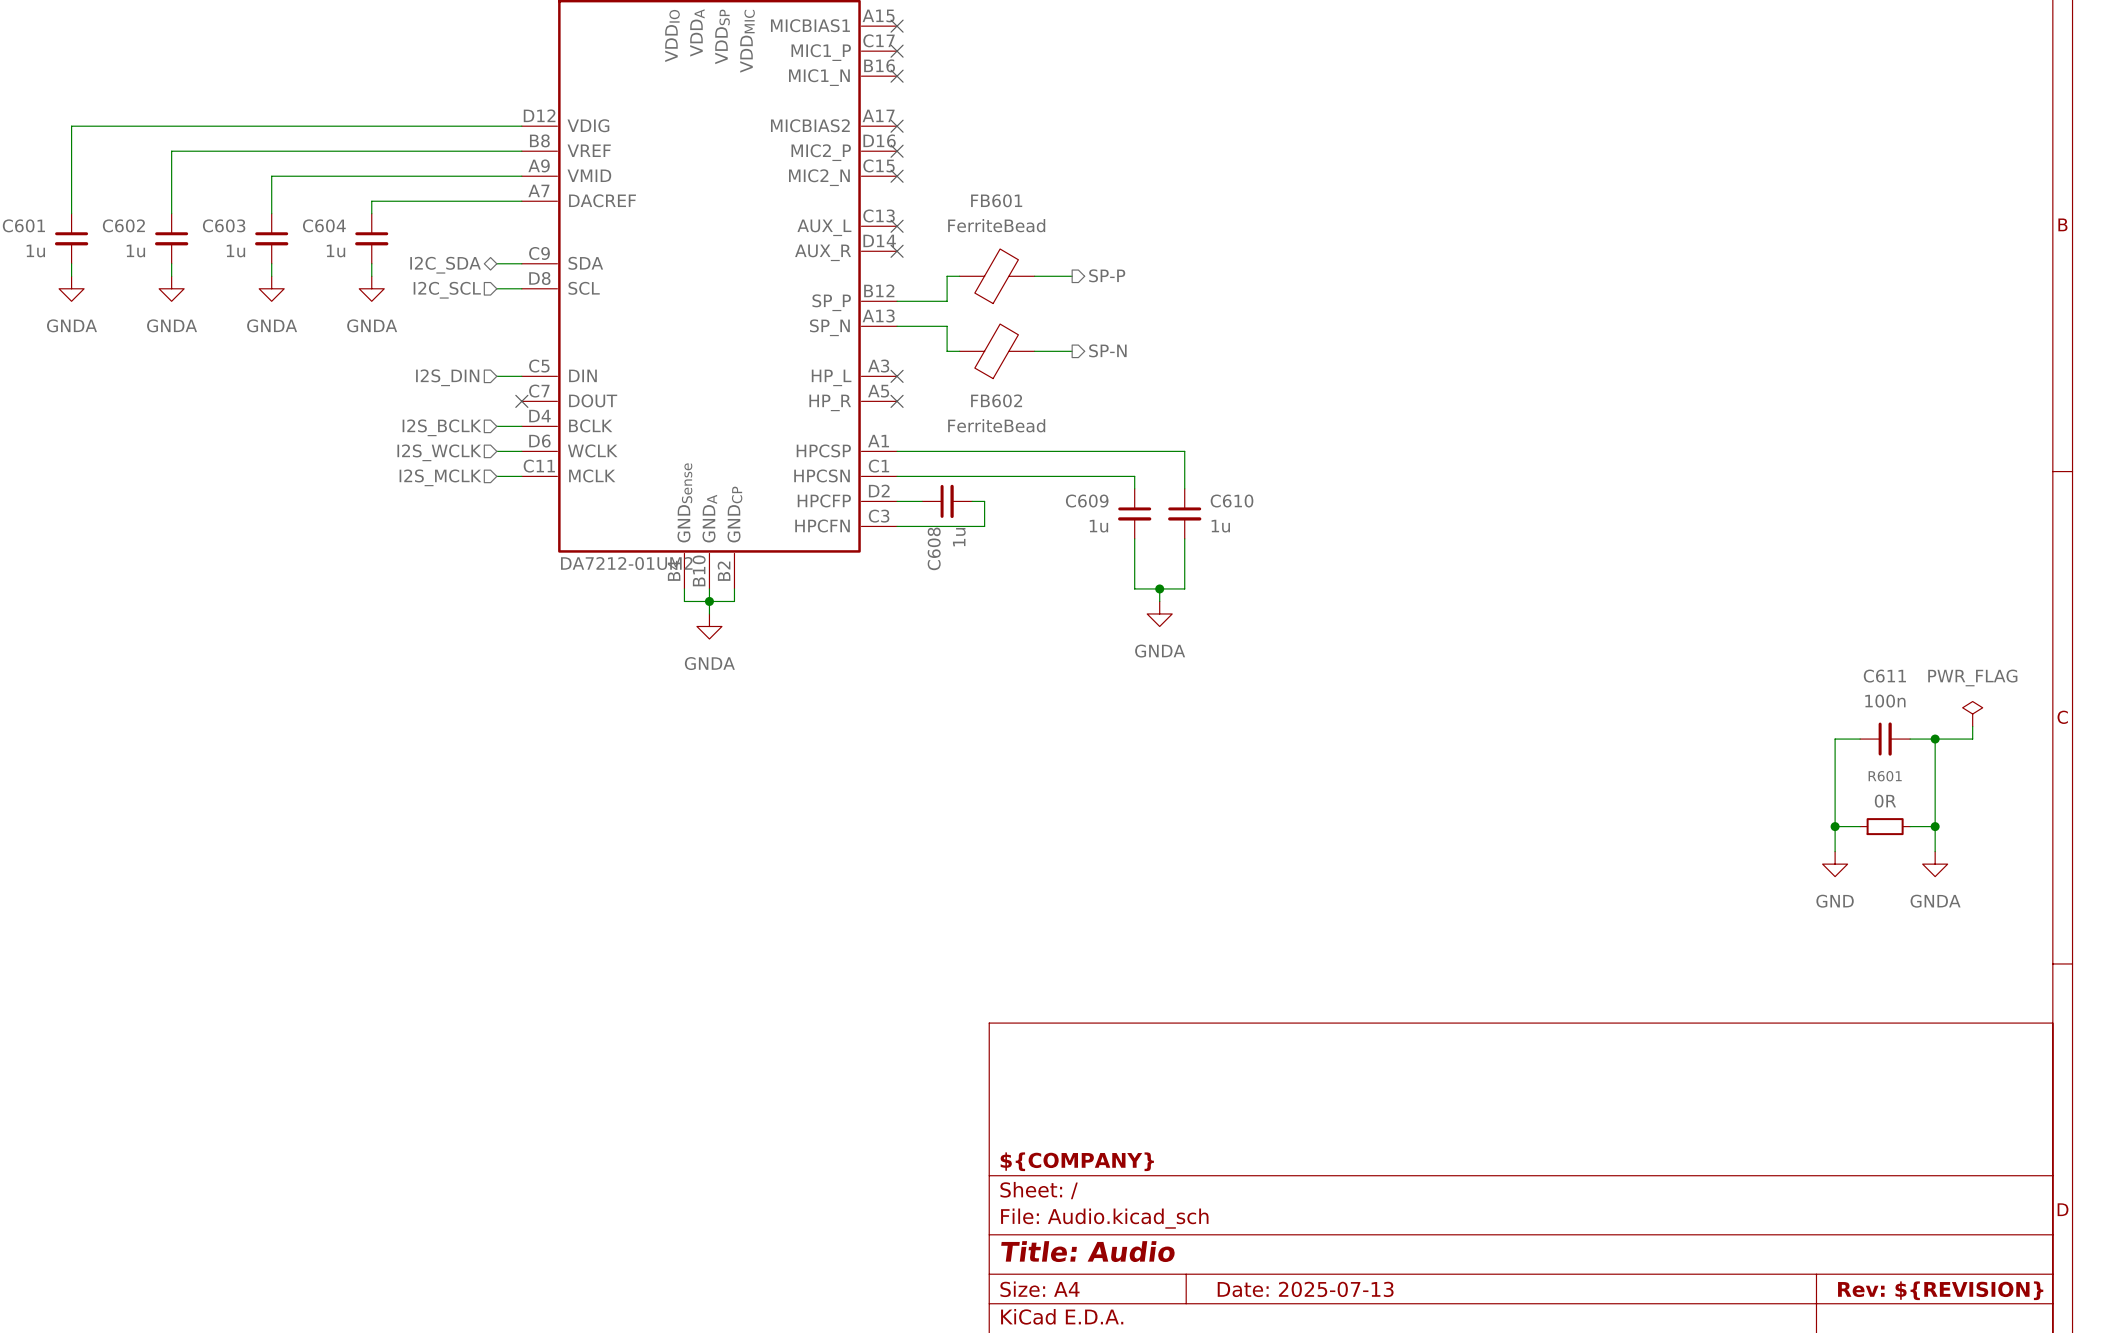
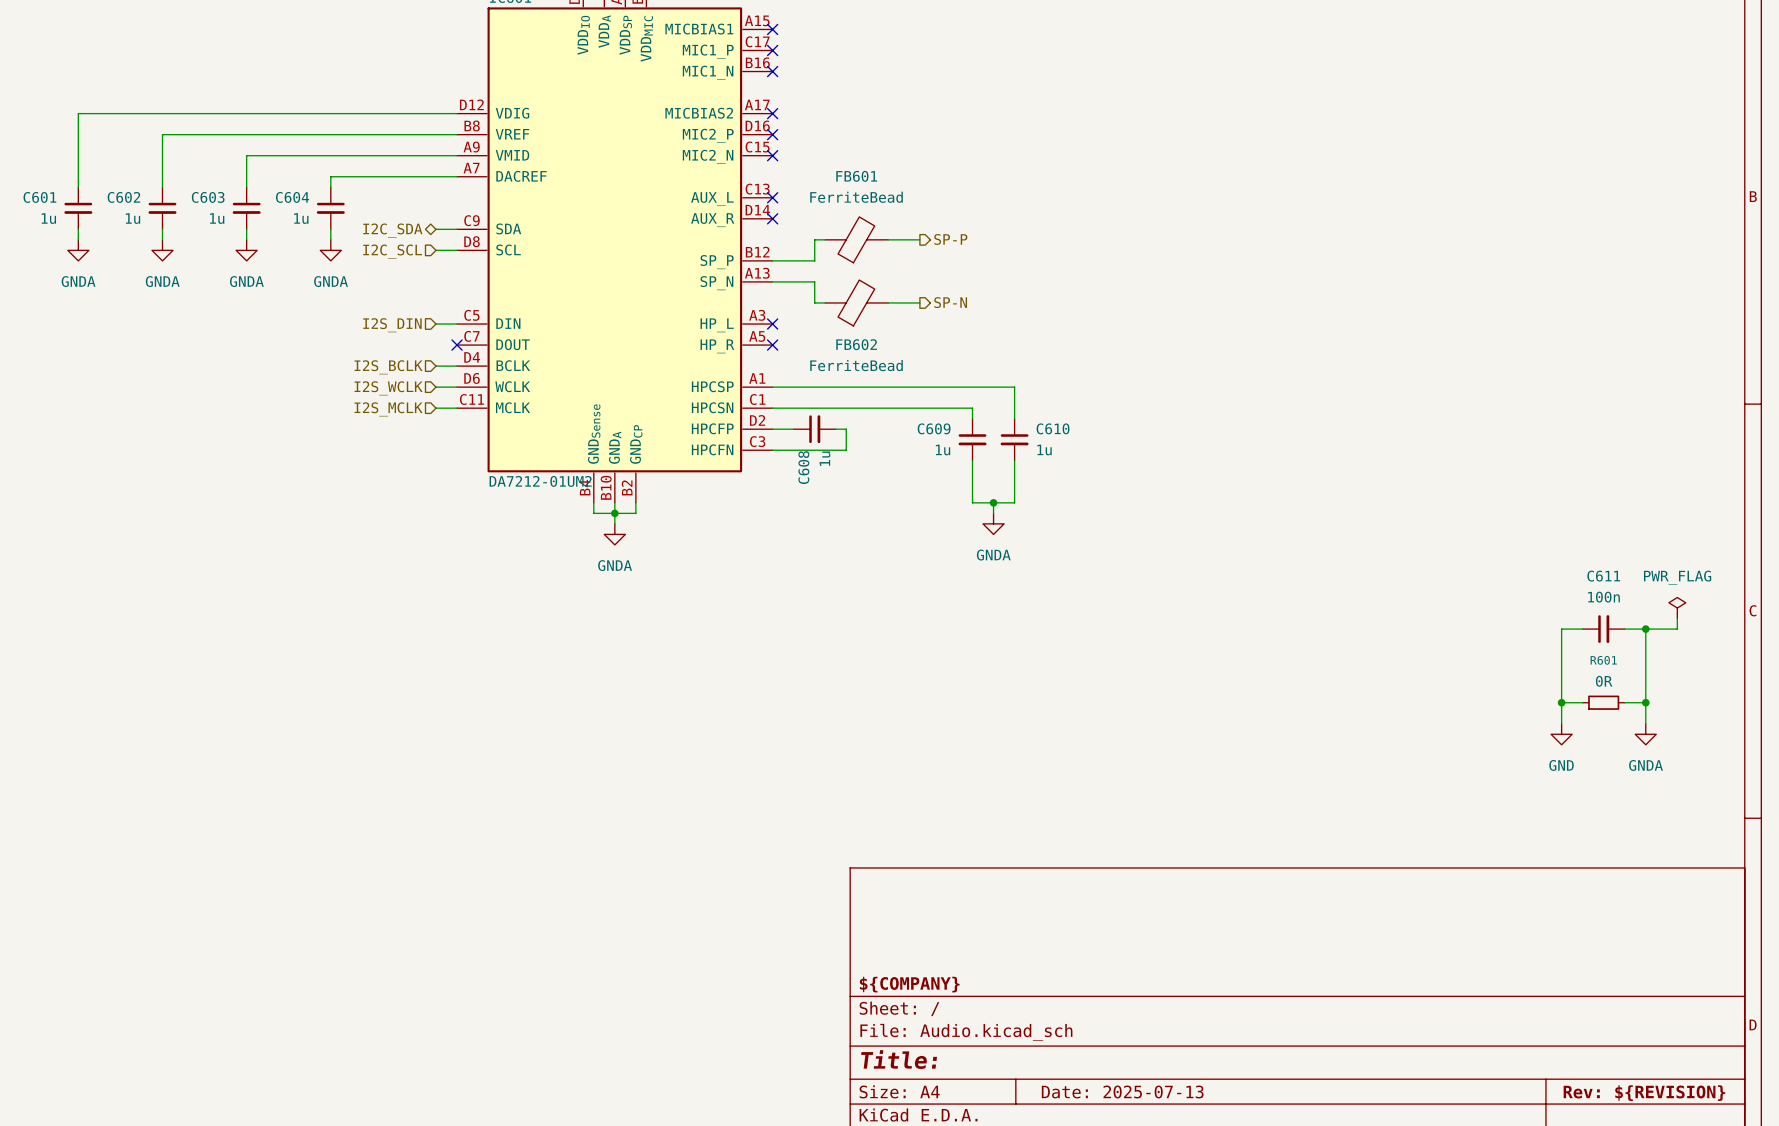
title block: Title: Audio (1088, 1251) -> Title: (899, 1059)

